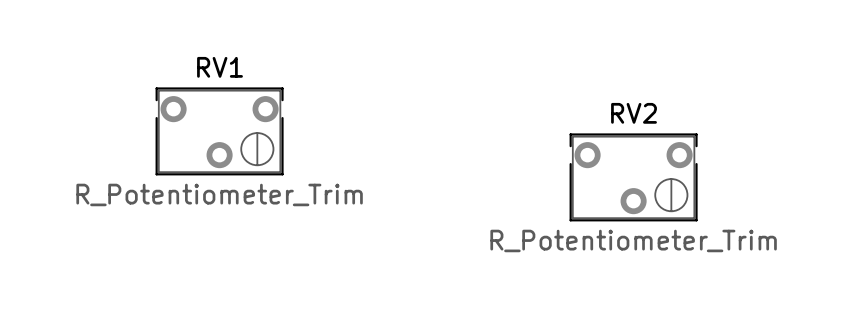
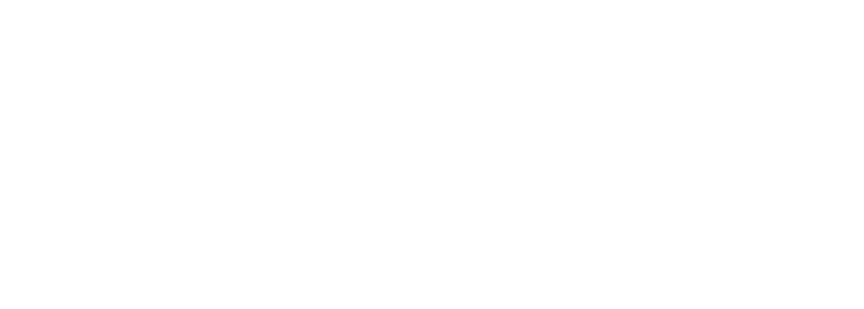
RV1: R_Potentiometer_Trim (219, 131) -> none
RV2: R_Potentiometer_Trim (633, 177) -> none

